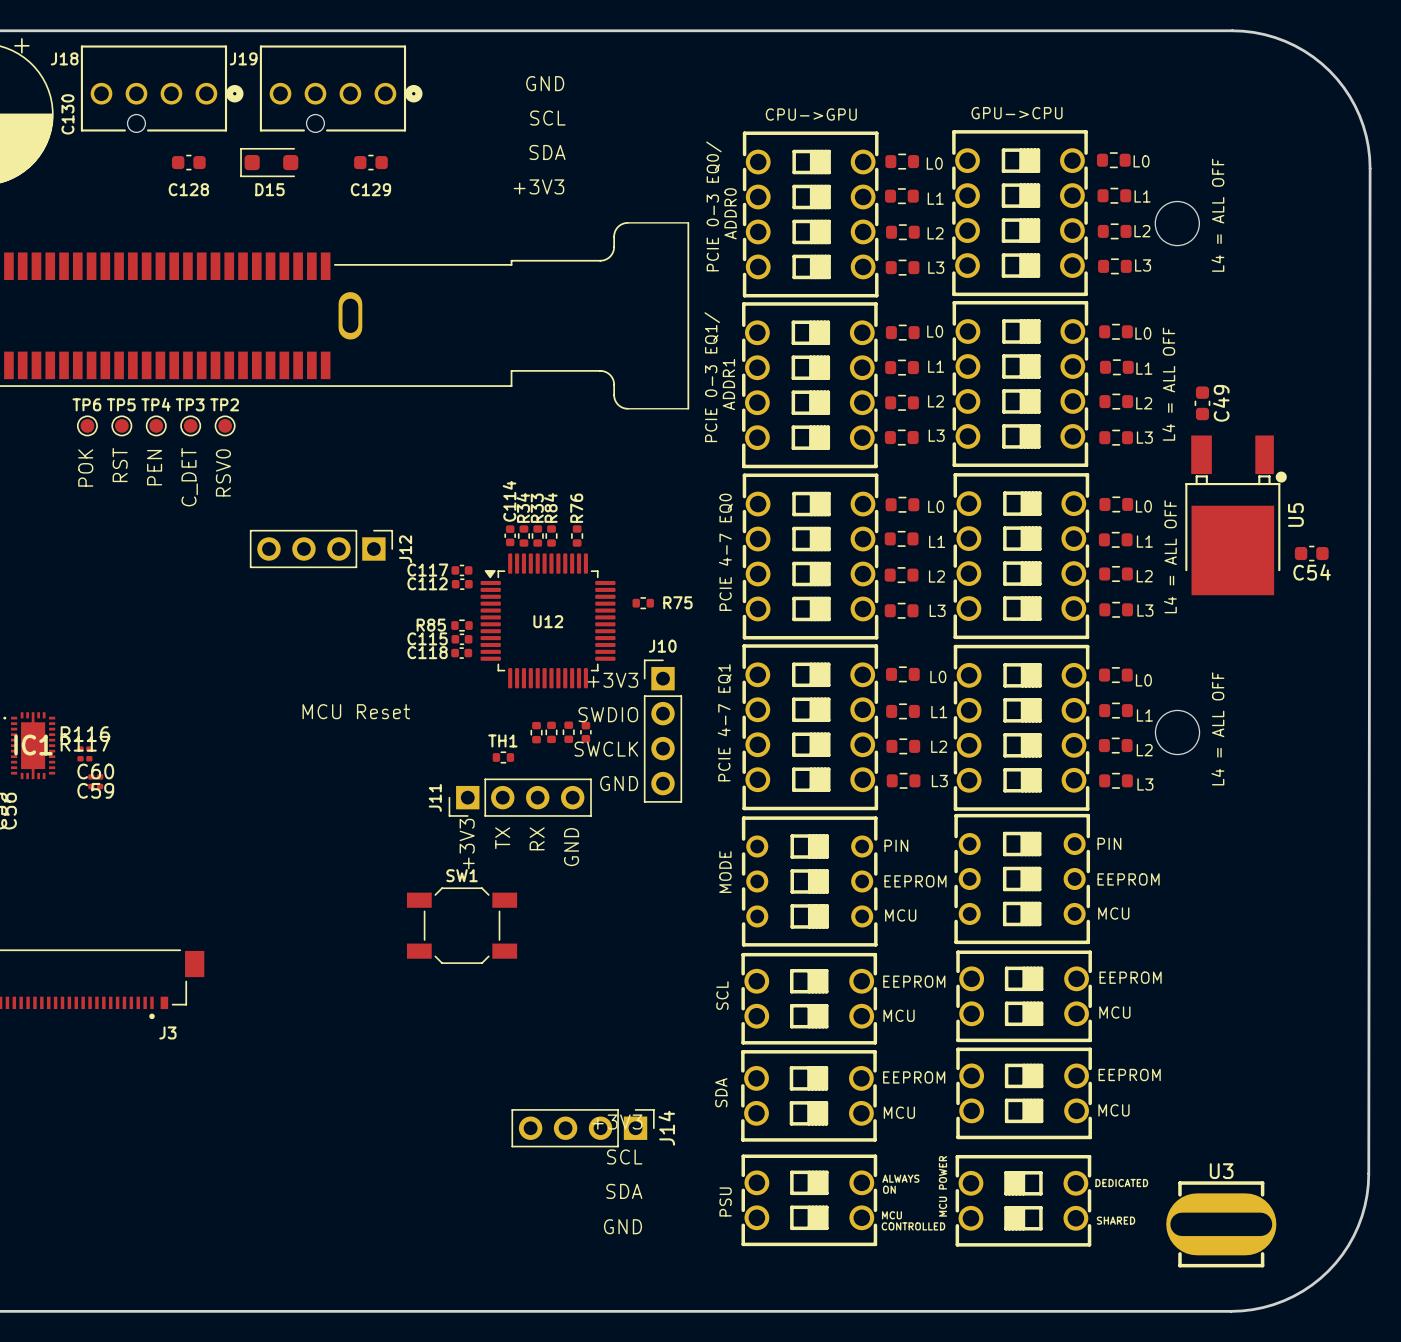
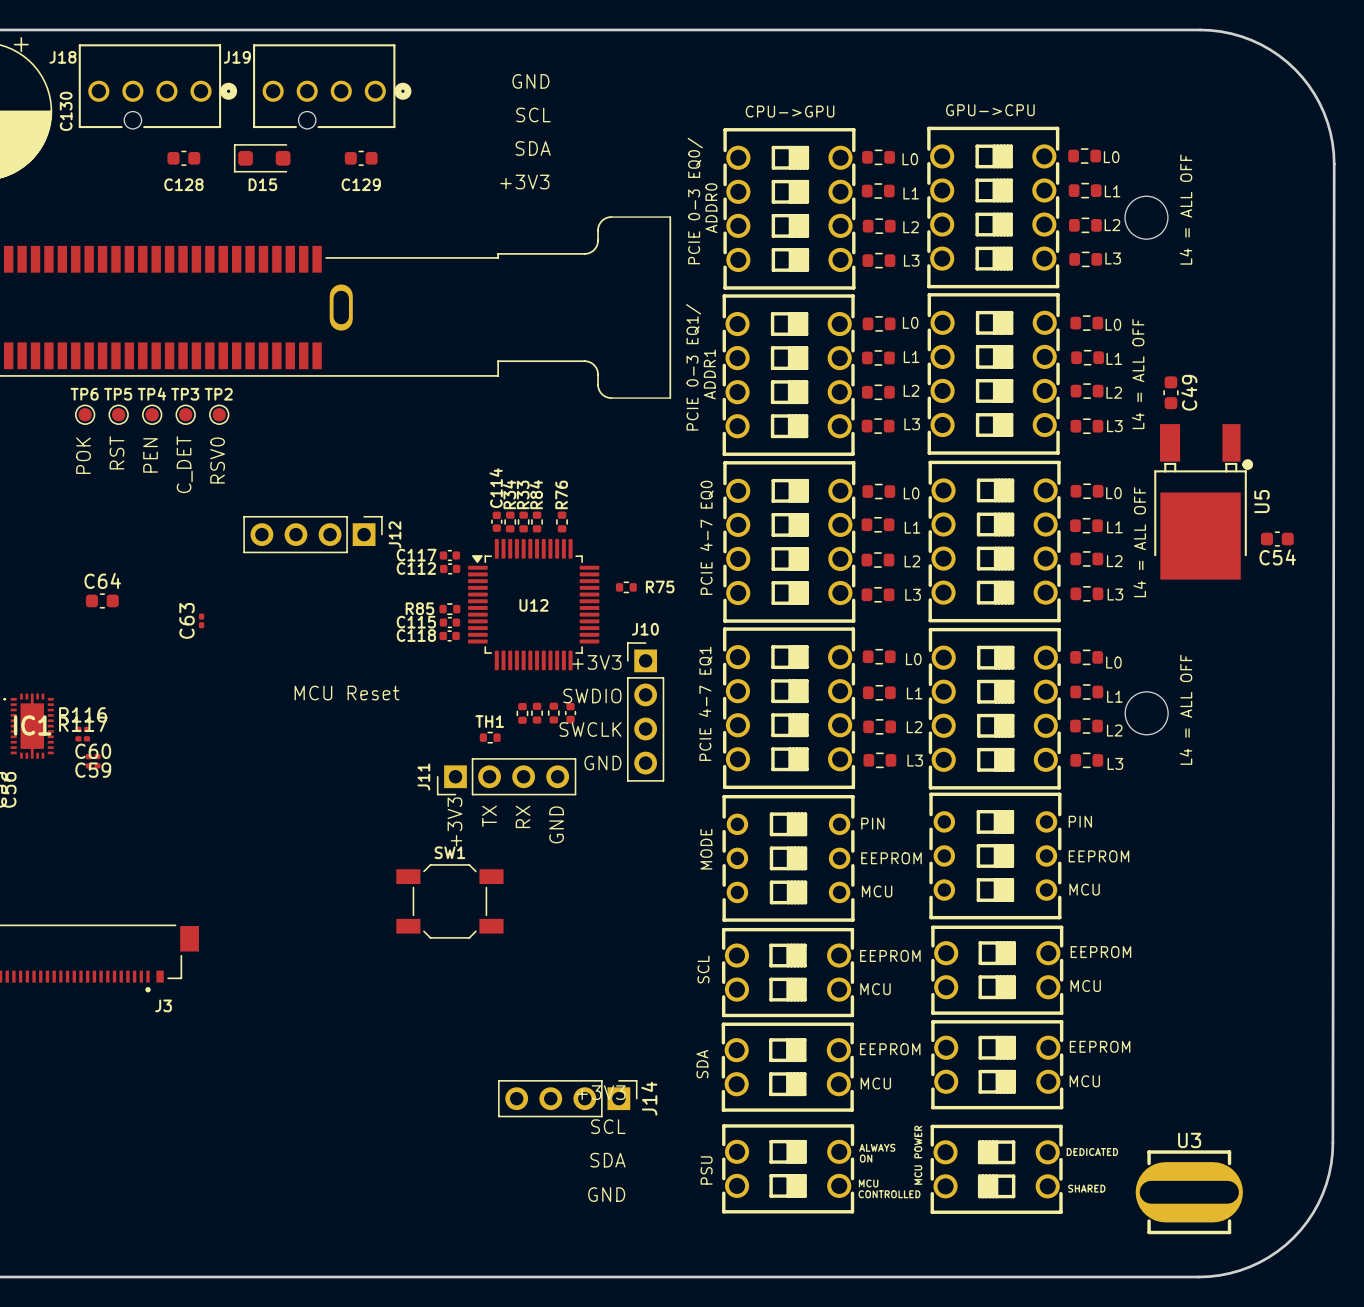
C64: none -> (102, 600)
C63: none -> (201, 620)

